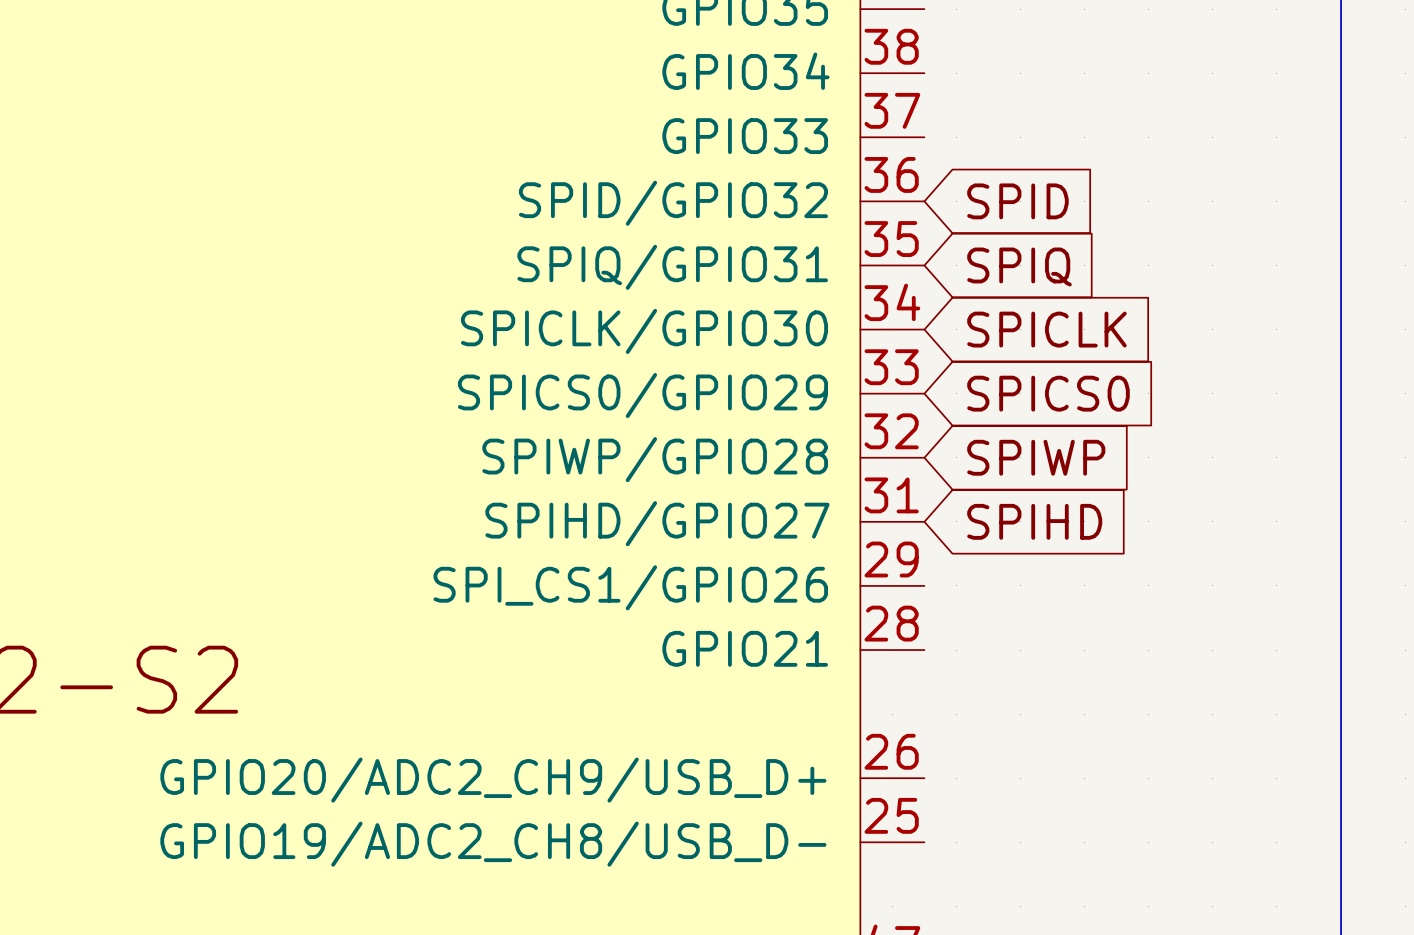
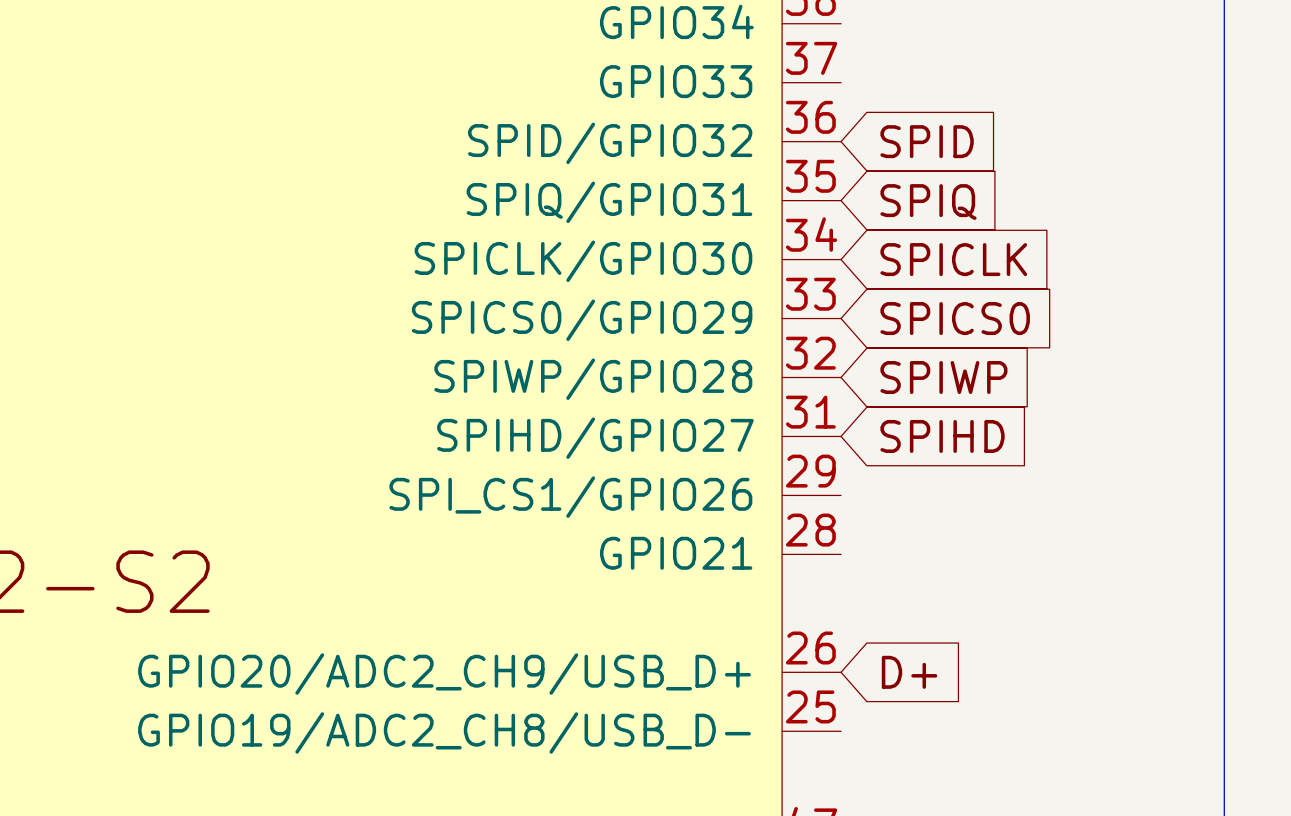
global label: none -> D+ (909, 672)

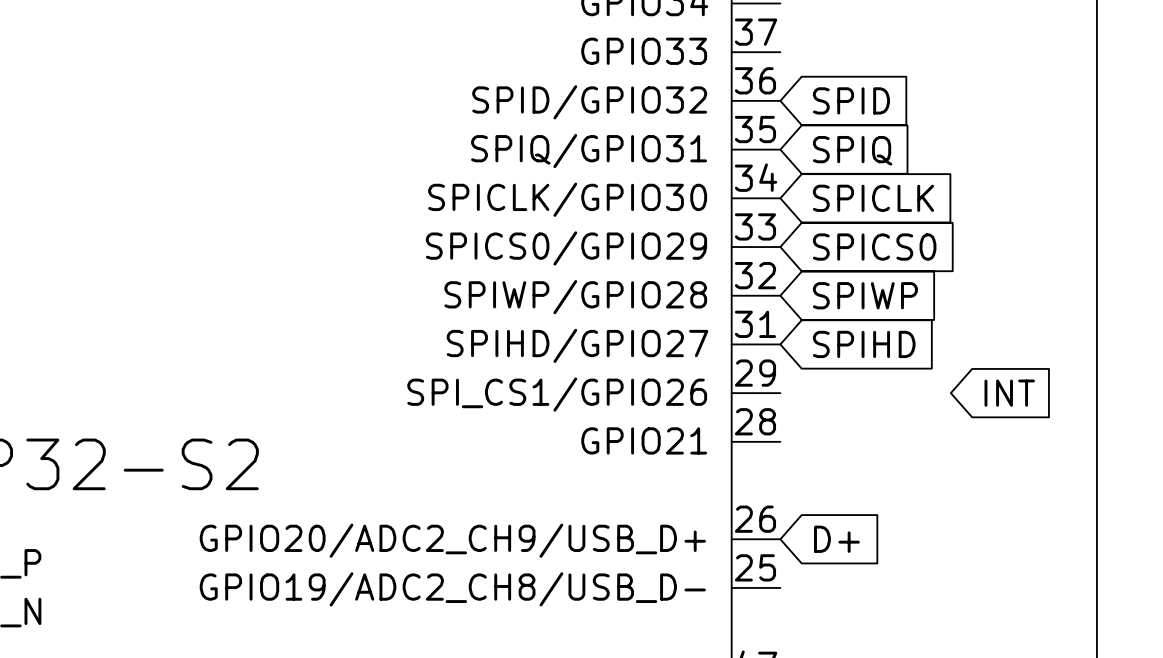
global label: none -> INT (1009, 393)

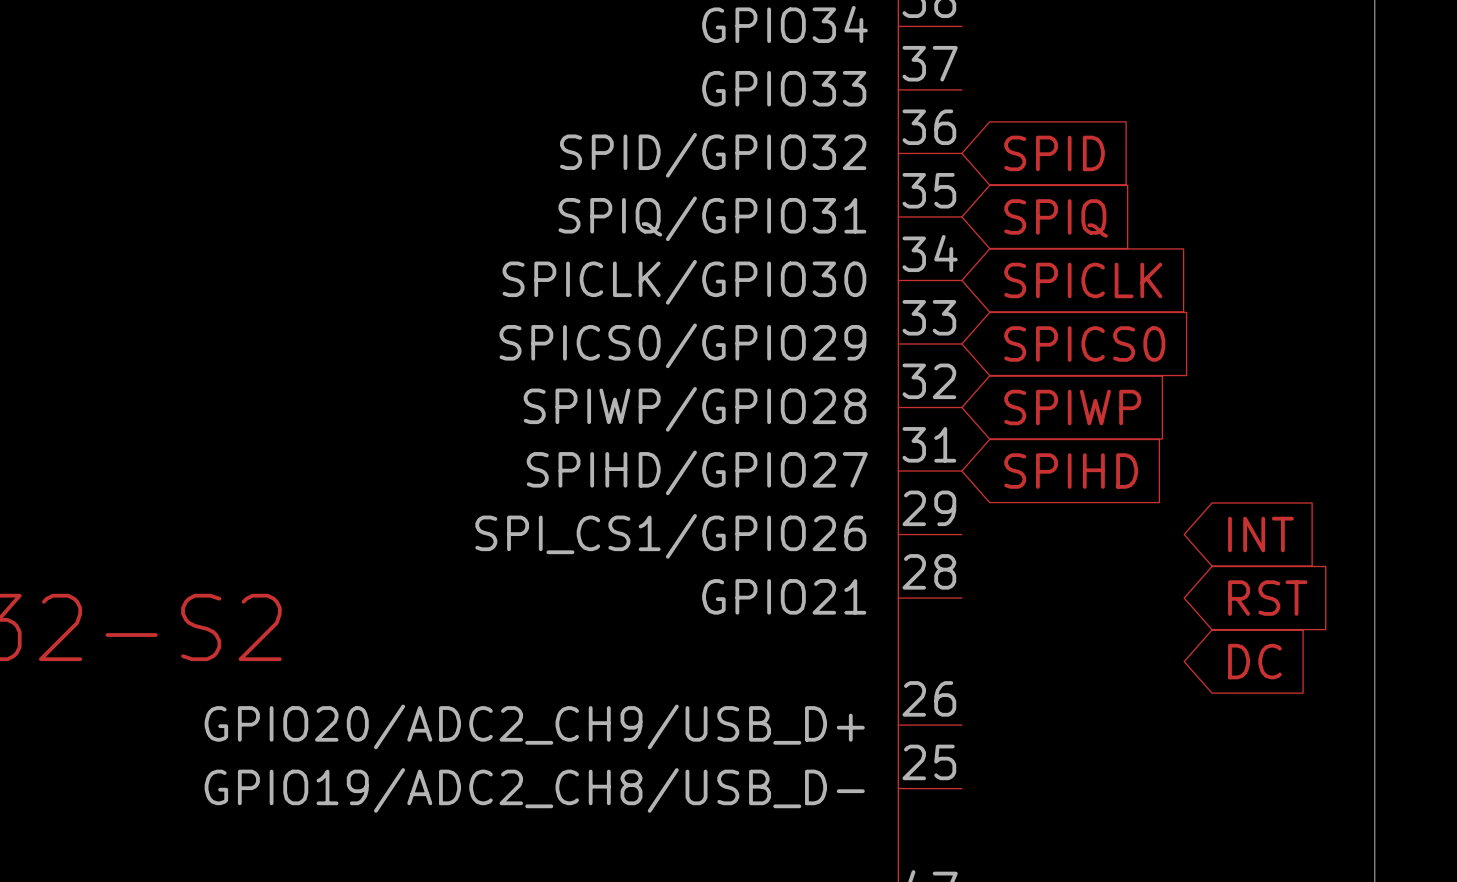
global label: none -> RST (1267, 598)
global label: none -> DC (1254, 661)
global label: D+ (836, 539) -> none

